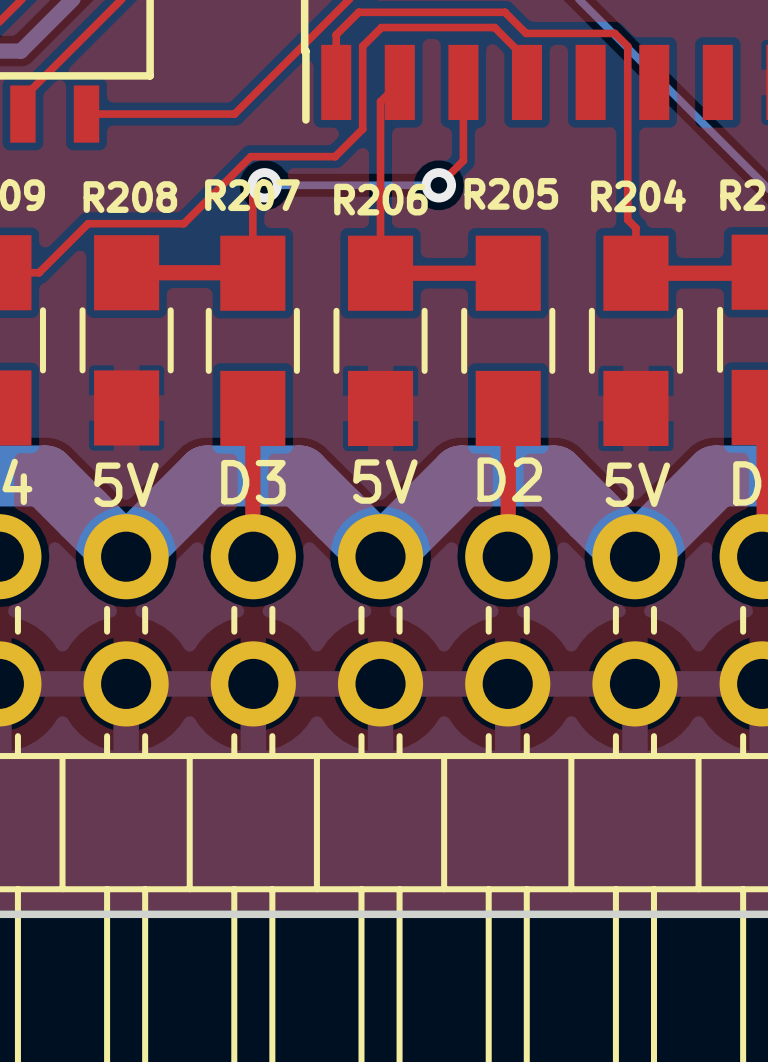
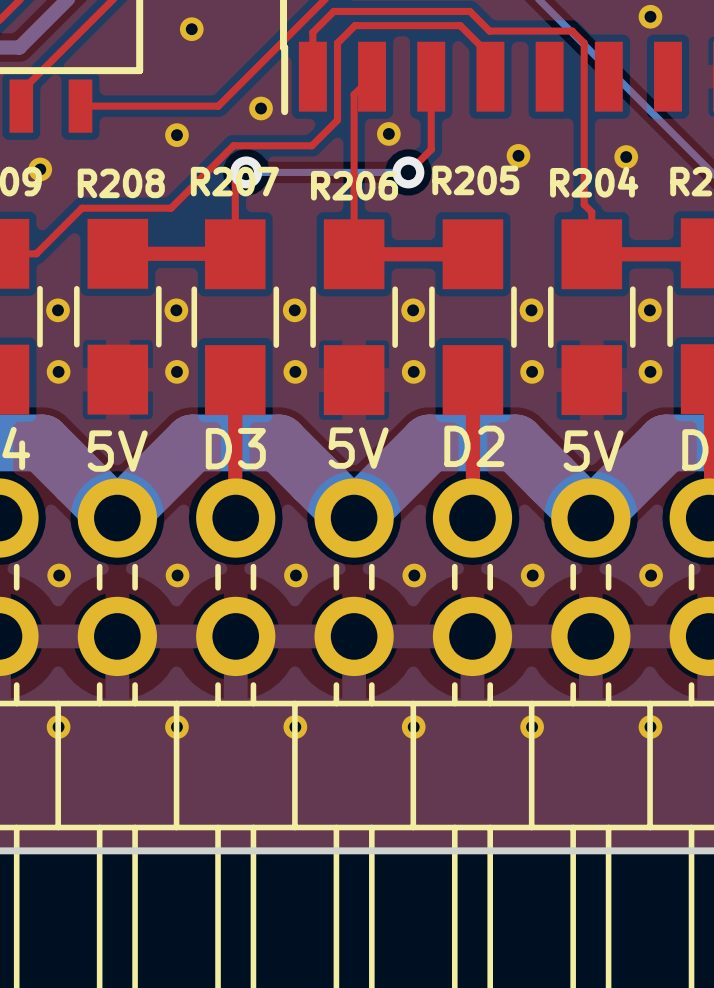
part: none -> (650, 16)
part: none -> (191, 29)
part: none -> (261, 108)
part: none -> (388, 133)
part: none -> (176, 135)
part: none -> (518, 155)
part: none -> (626, 157)
part: none -> (40, 169)
part: none -> (58, 310)
part: none -> (176, 310)
part: none -> (294, 310)
part: none -> (413, 310)
part: none -> (531, 310)
part: none -> (649, 310)
part: none -> (58, 371)
part: none -> (176, 371)
part: none -> (295, 371)
part: none -> (413, 371)
part: none -> (532, 371)
part: none -> (650, 371)
part: none -> (59, 575)
part: none -> (177, 575)
part: none -> (295, 575)
part: none -> (414, 575)
part: none -> (532, 575)
part: none -> (651, 575)
part: none -> (58, 727)
part: none -> (176, 727)
part: none -> (295, 727)
part: none -> (413, 727)
part: none -> (532, 727)
part: none -> (650, 727)

